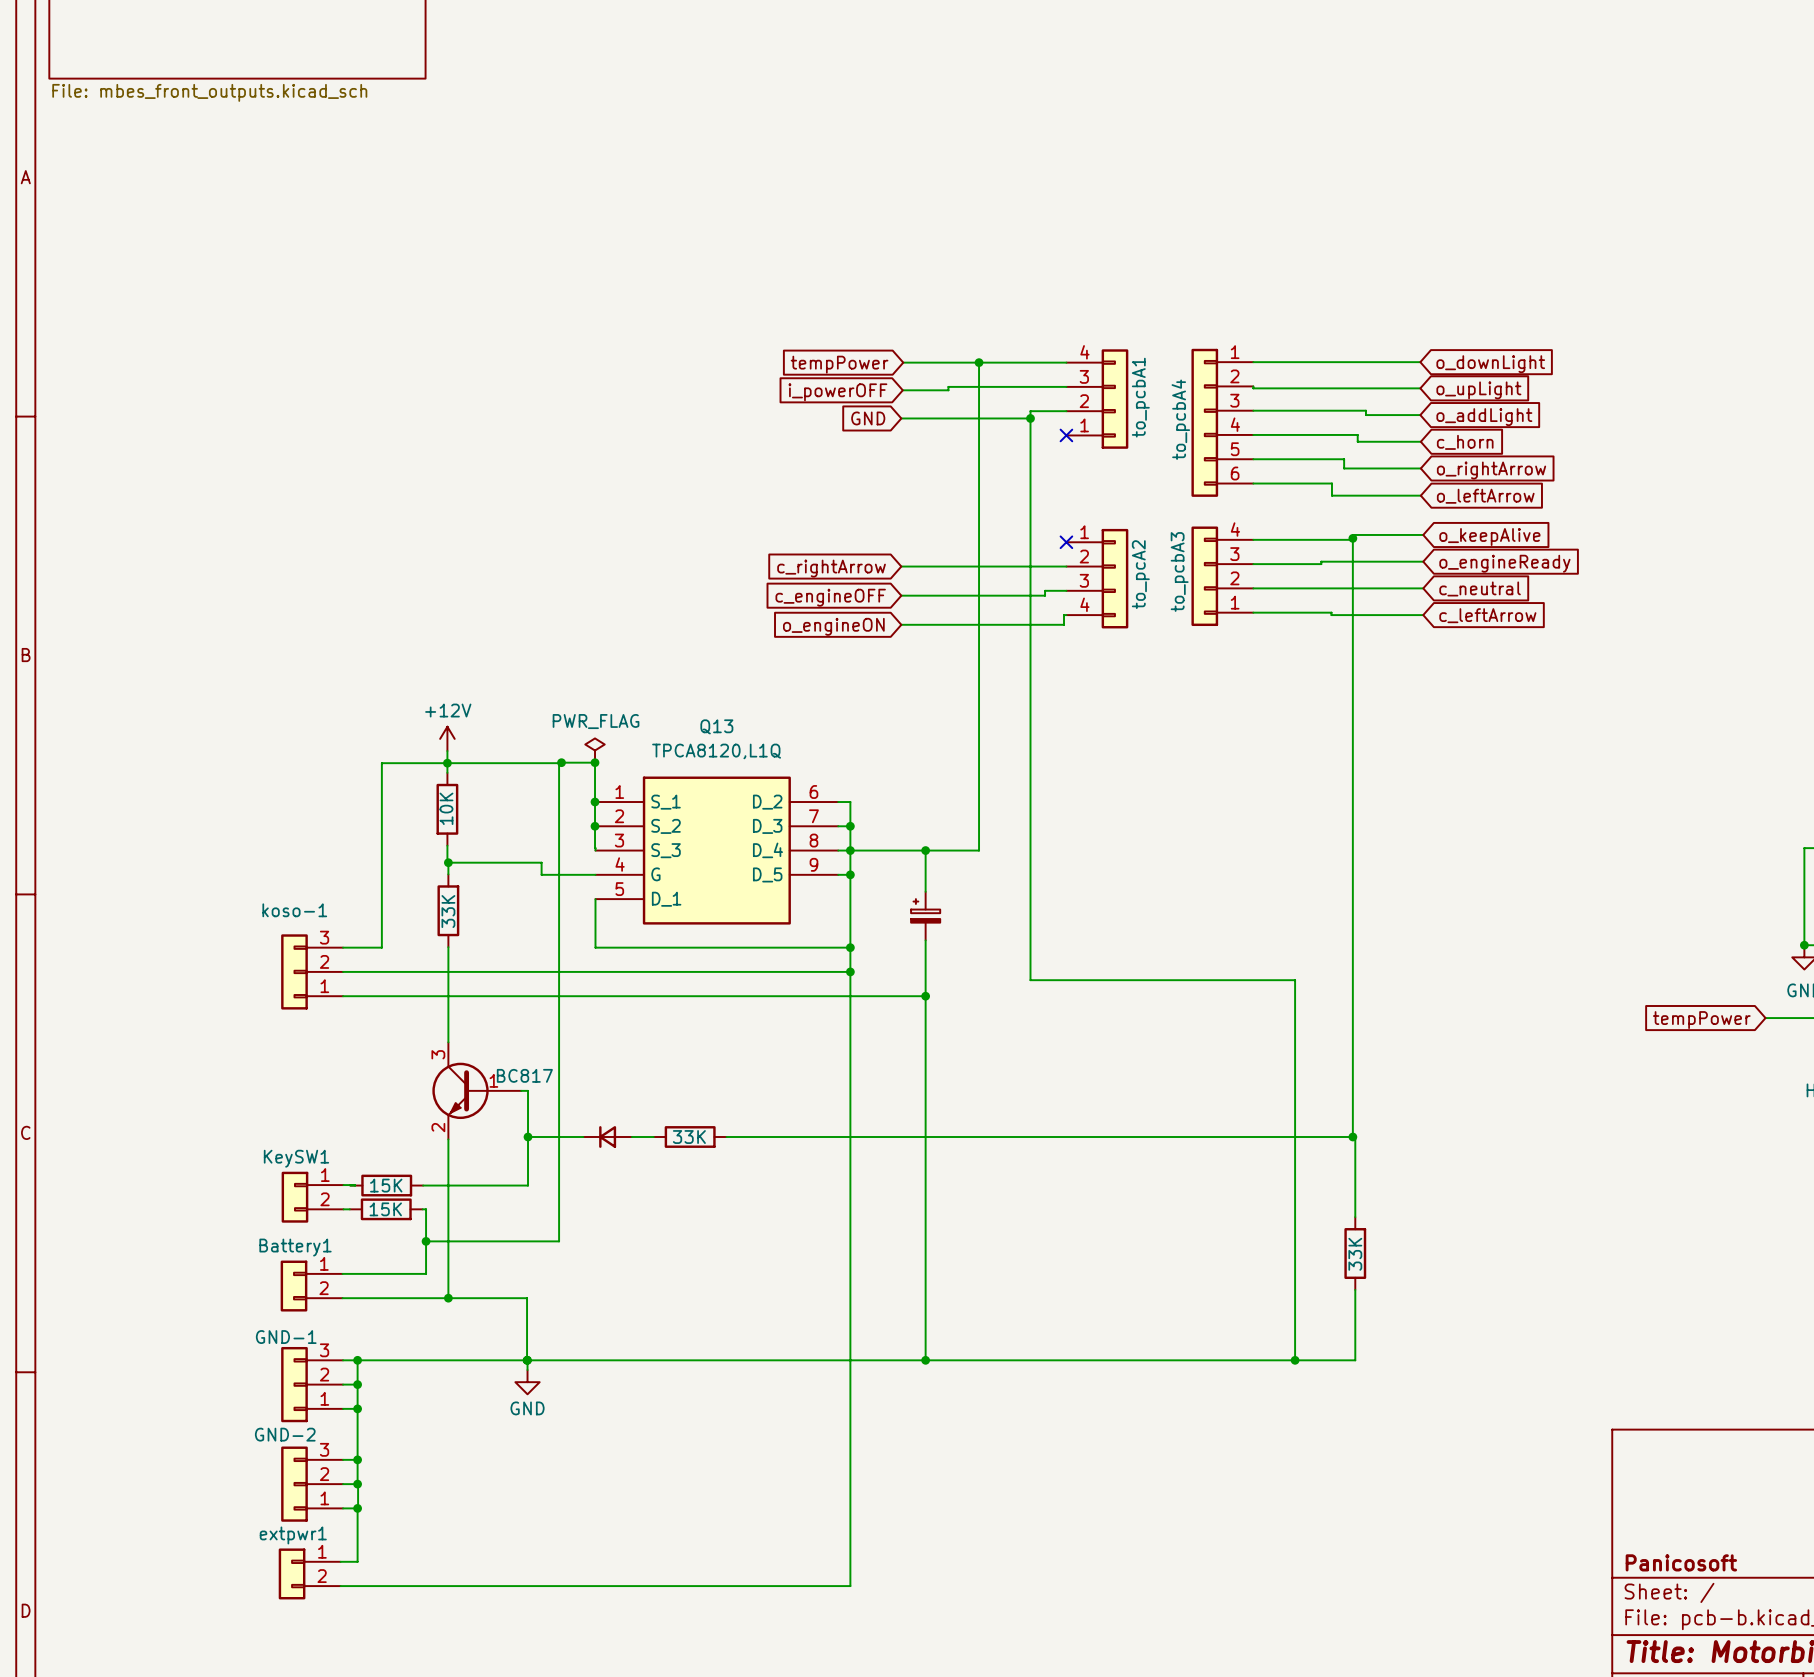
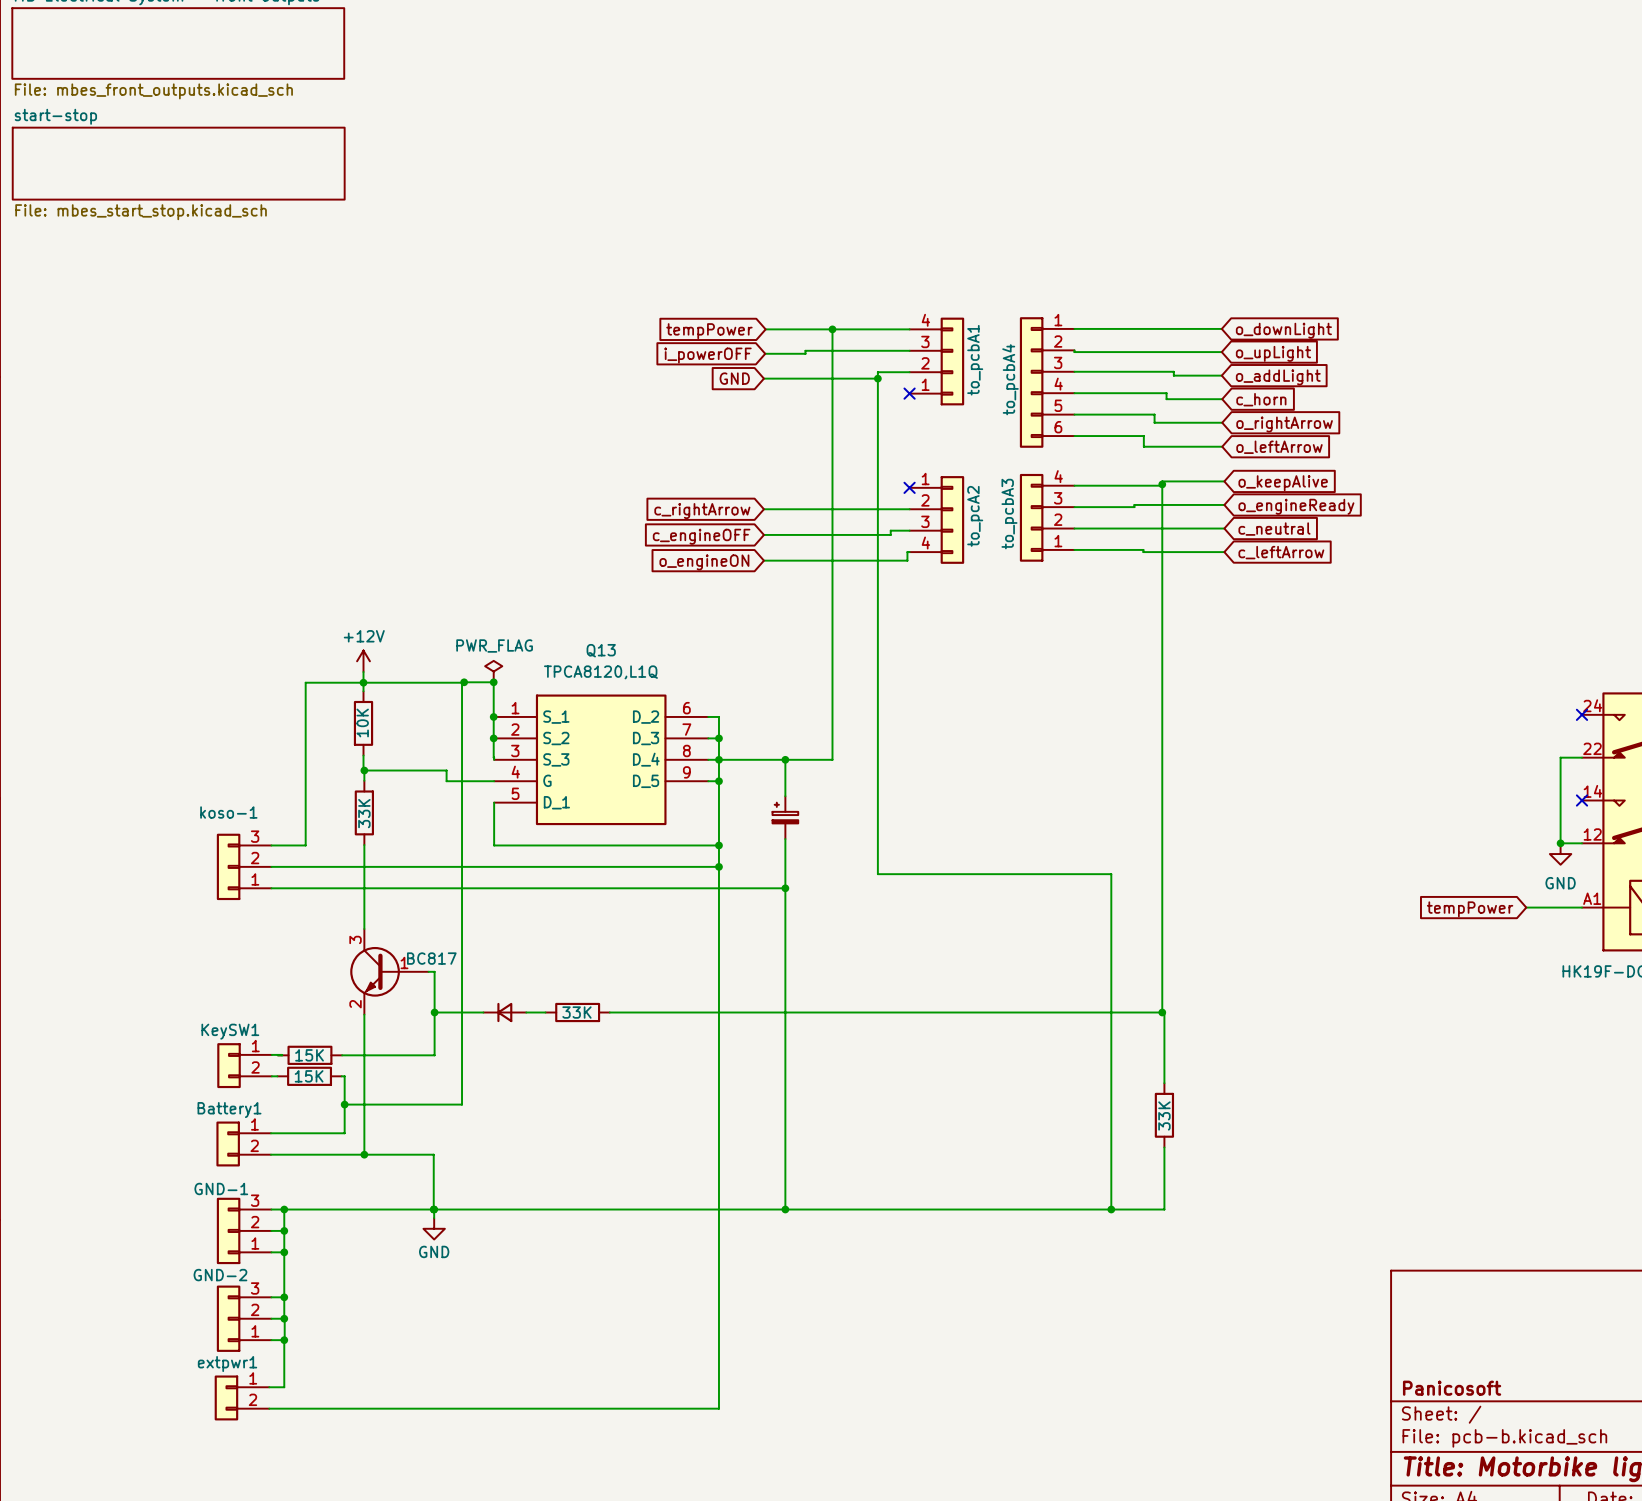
sheet start-stop: none -> File: mbes_start_stop.kicad_sch (178, 163)

